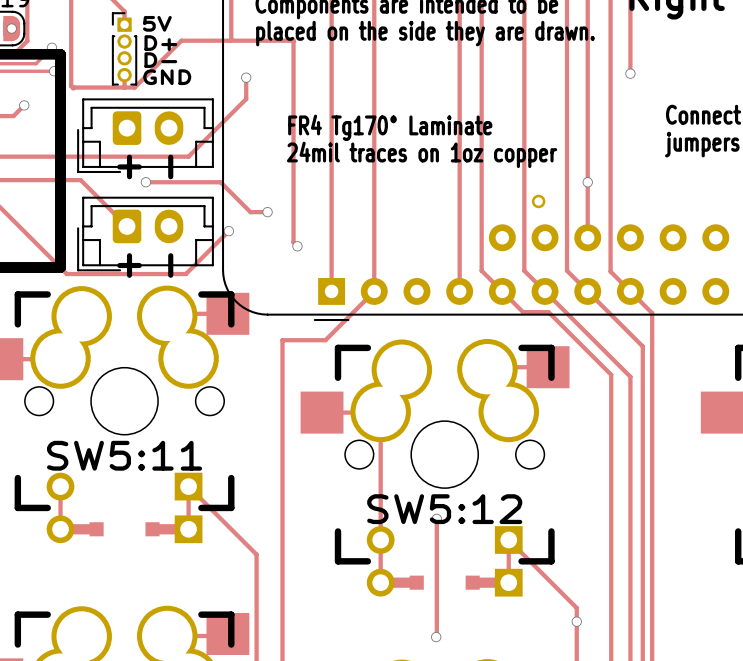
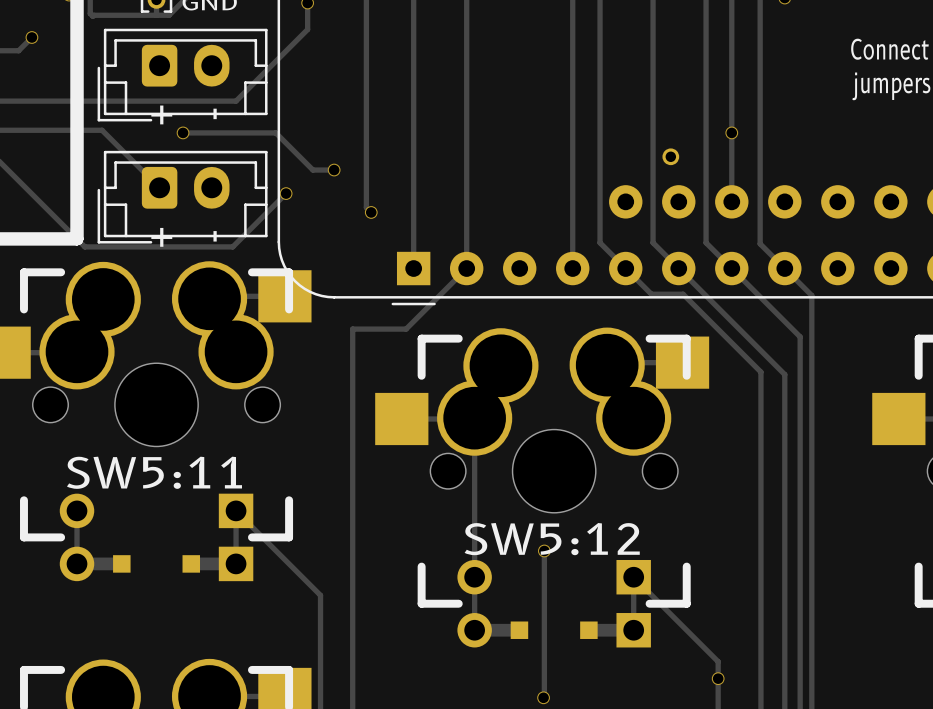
text: FR4 Tg170° Laminate (390, 127) -> none
text: 24mil traces on 1oz copper (422, 154) -> none

